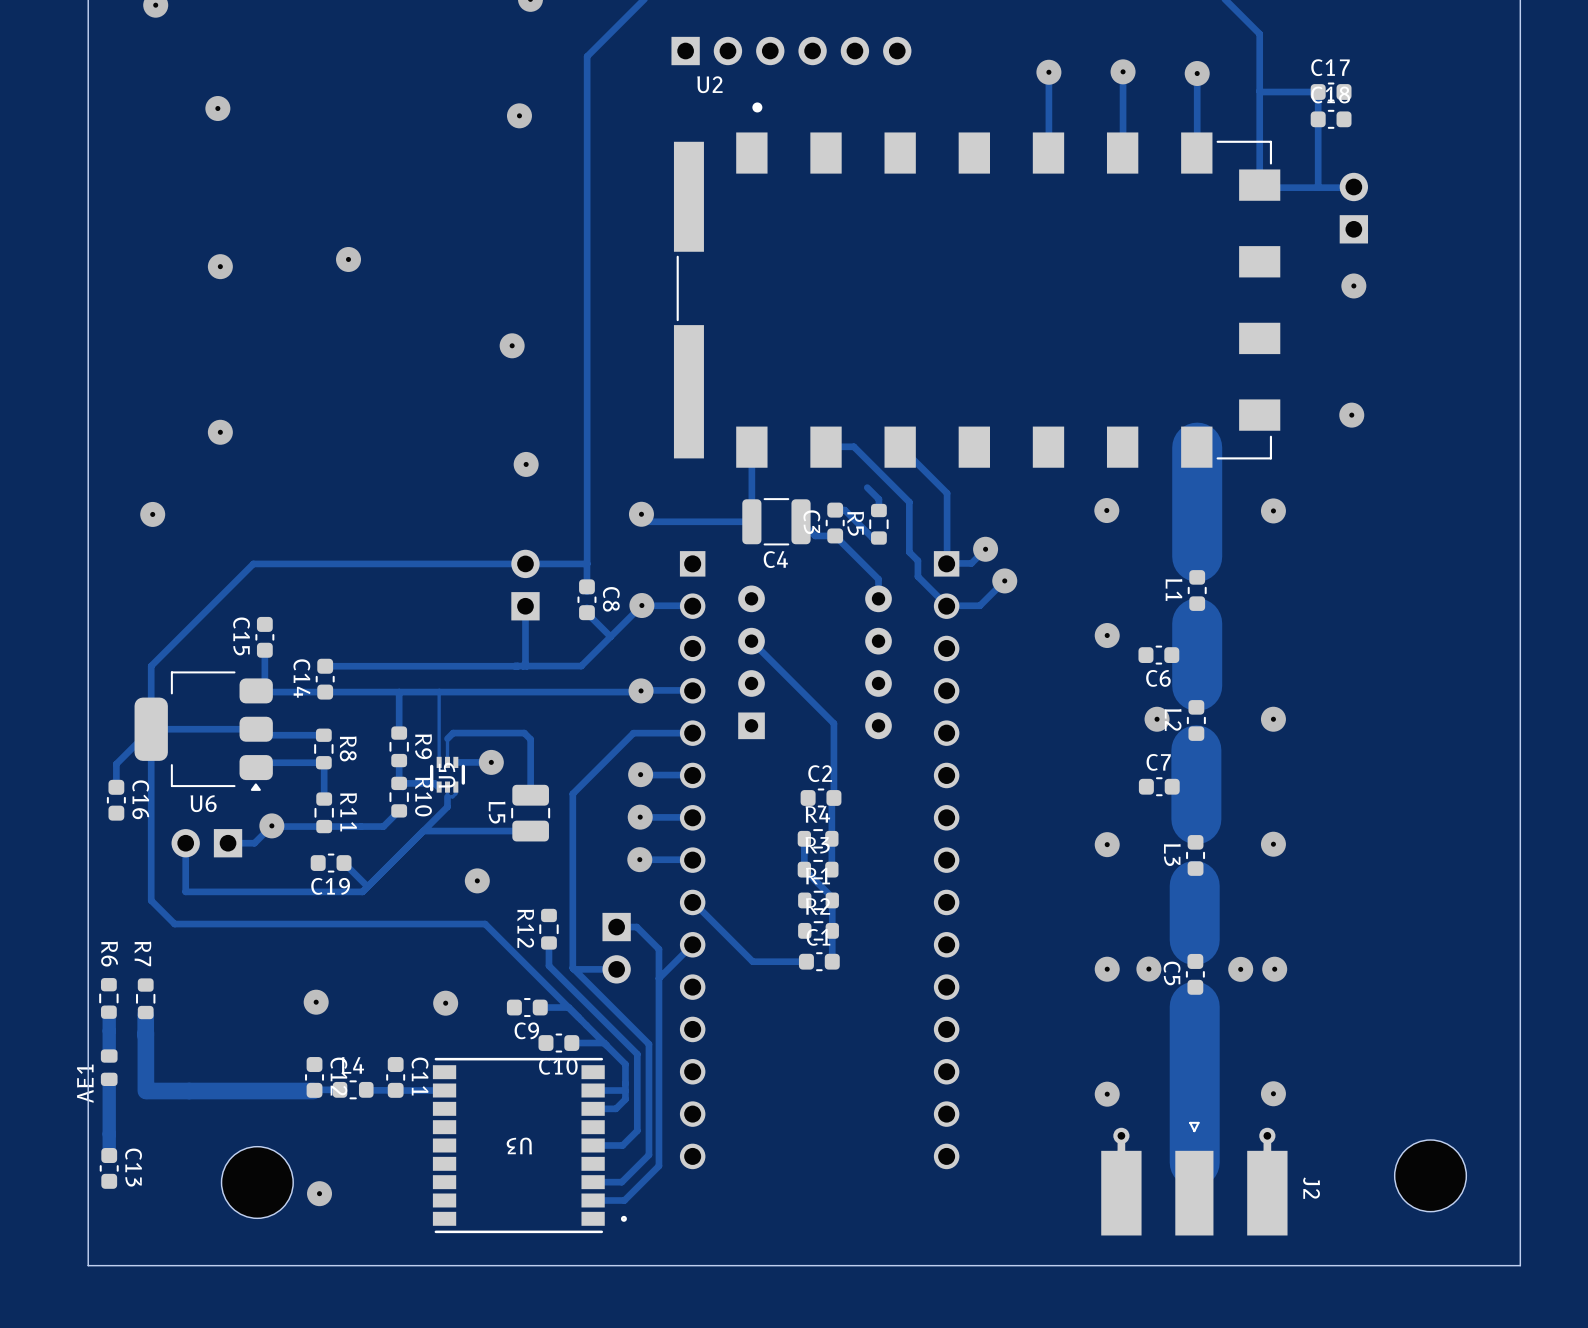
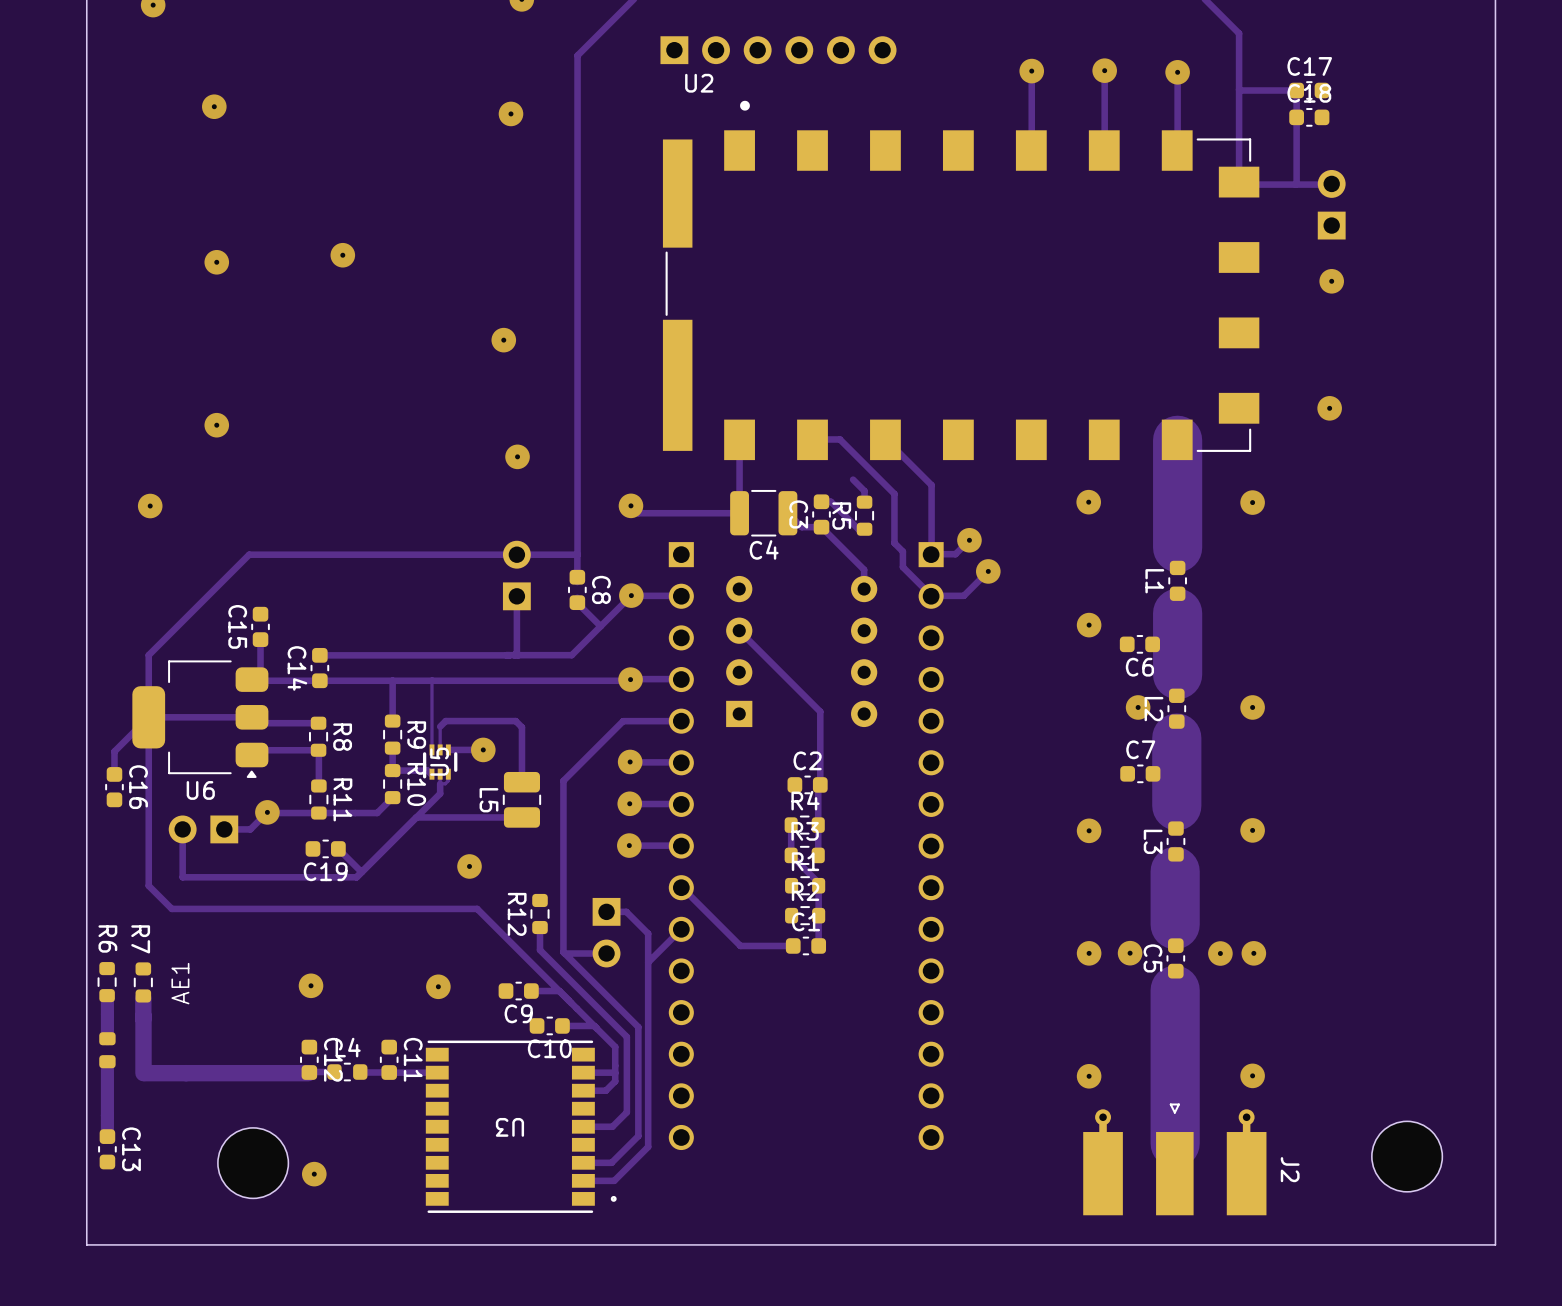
AE1 name position: AE1 (85, 1083) -> AE1 (180, 983)

